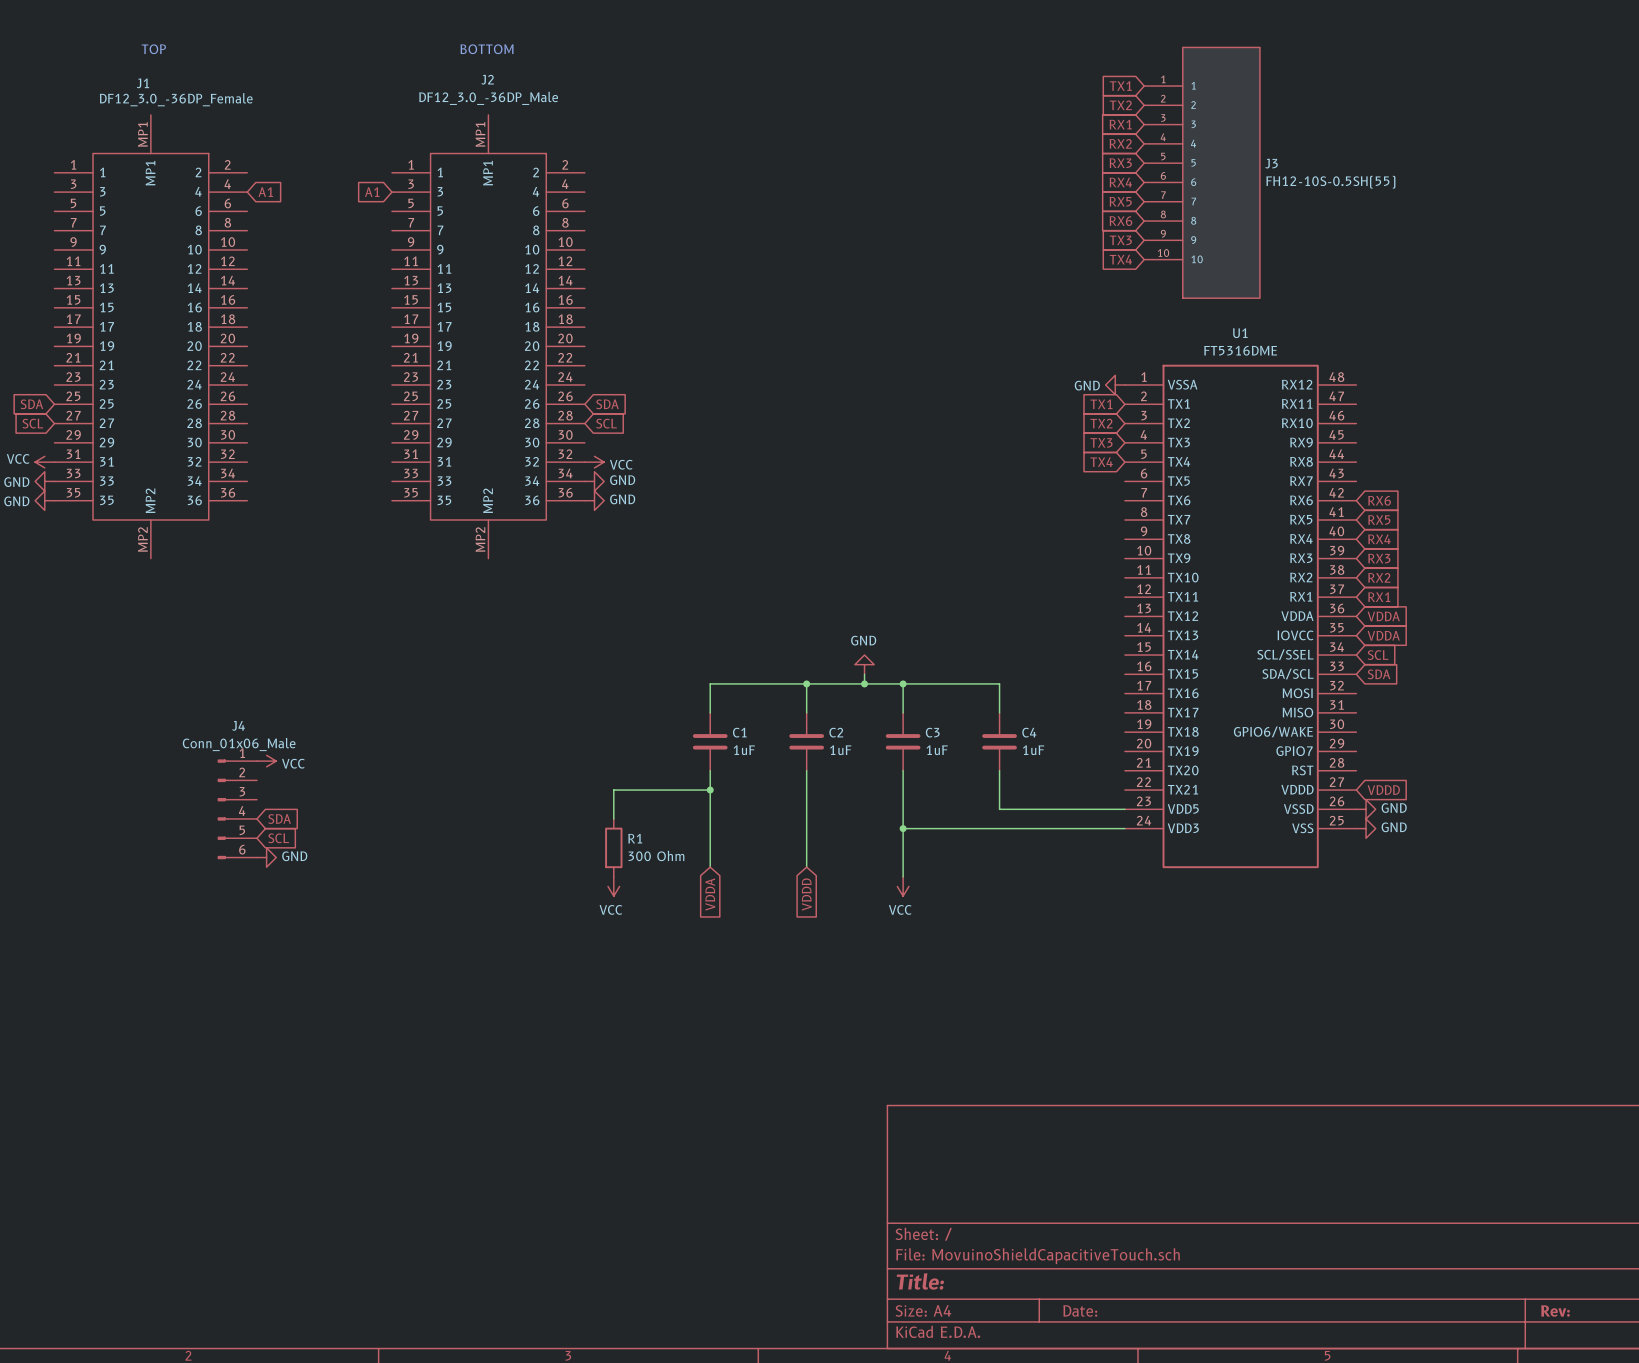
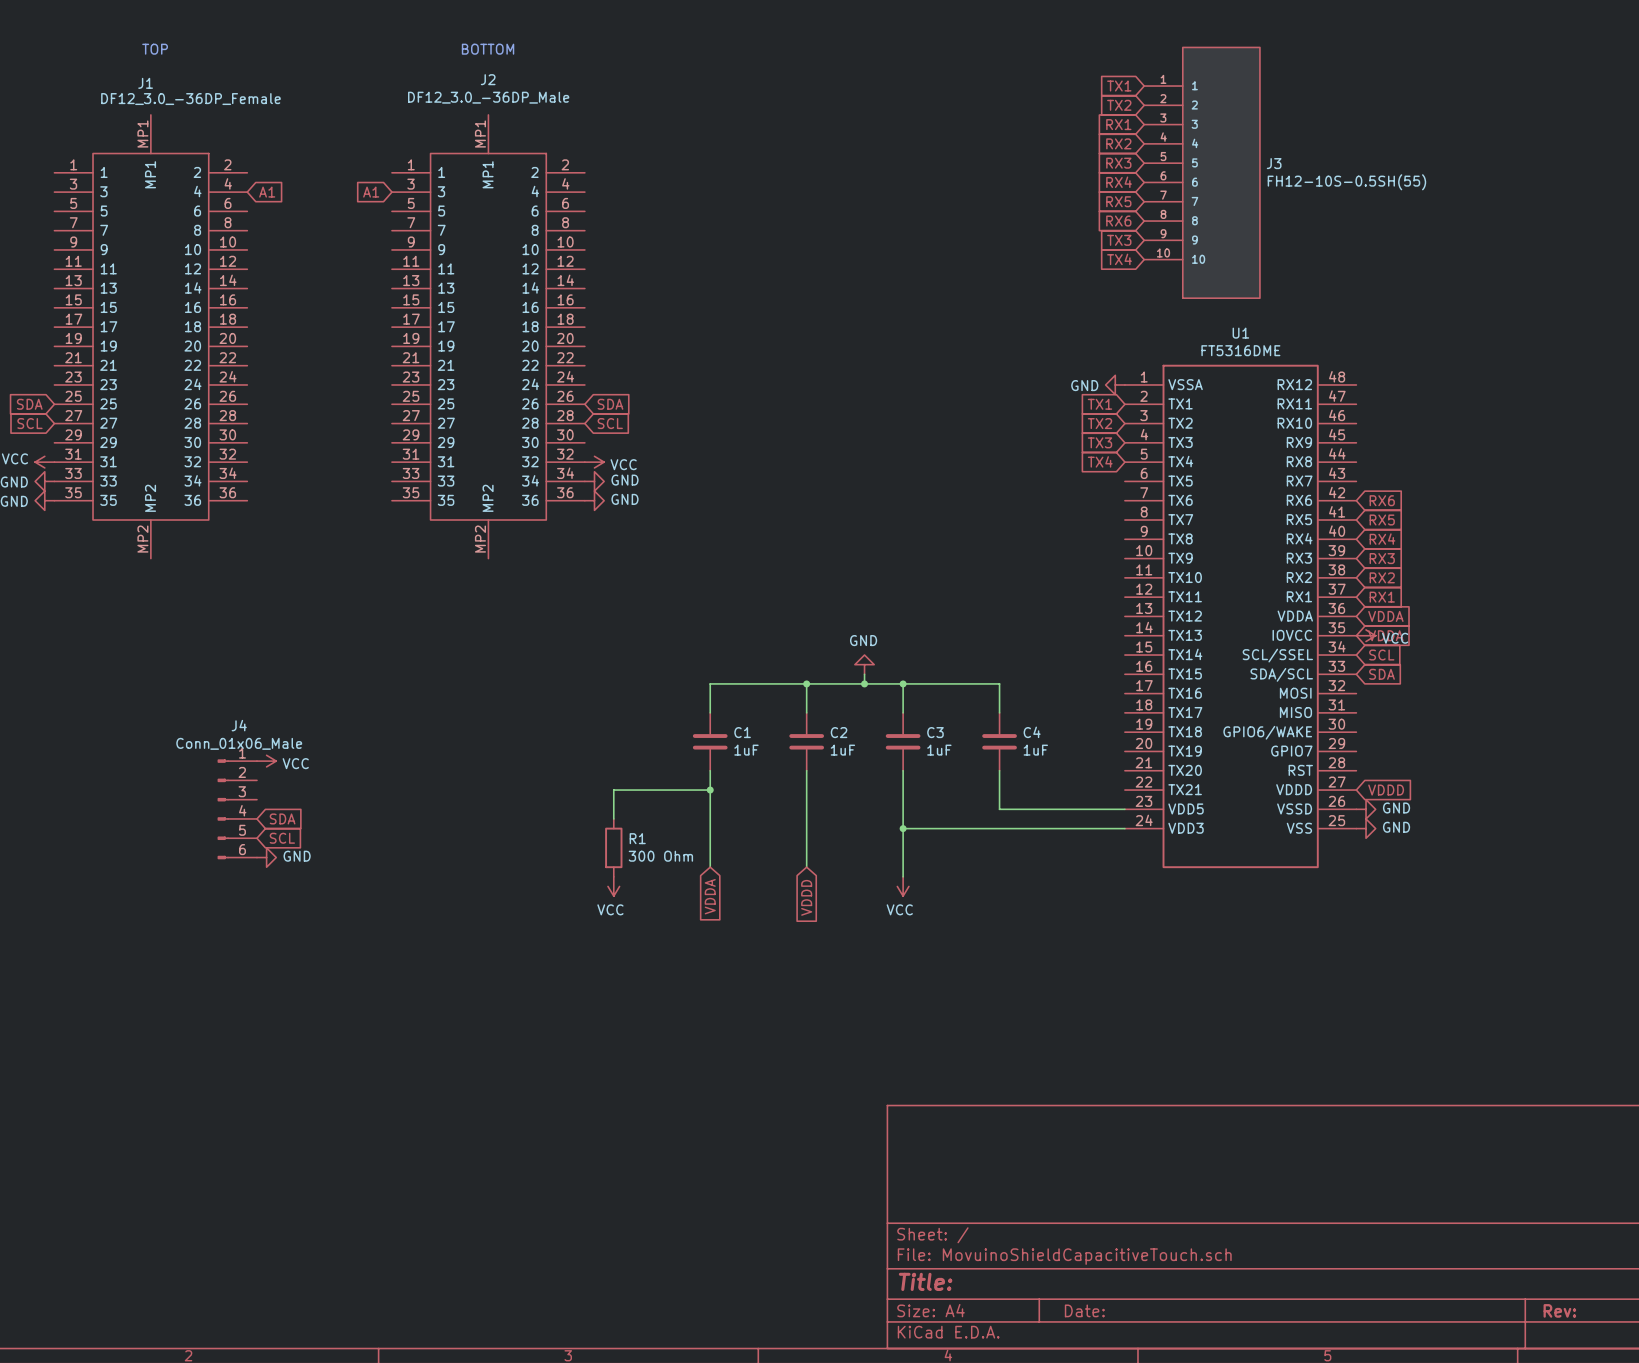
power symbol: none -> VCC (1366, 635)

